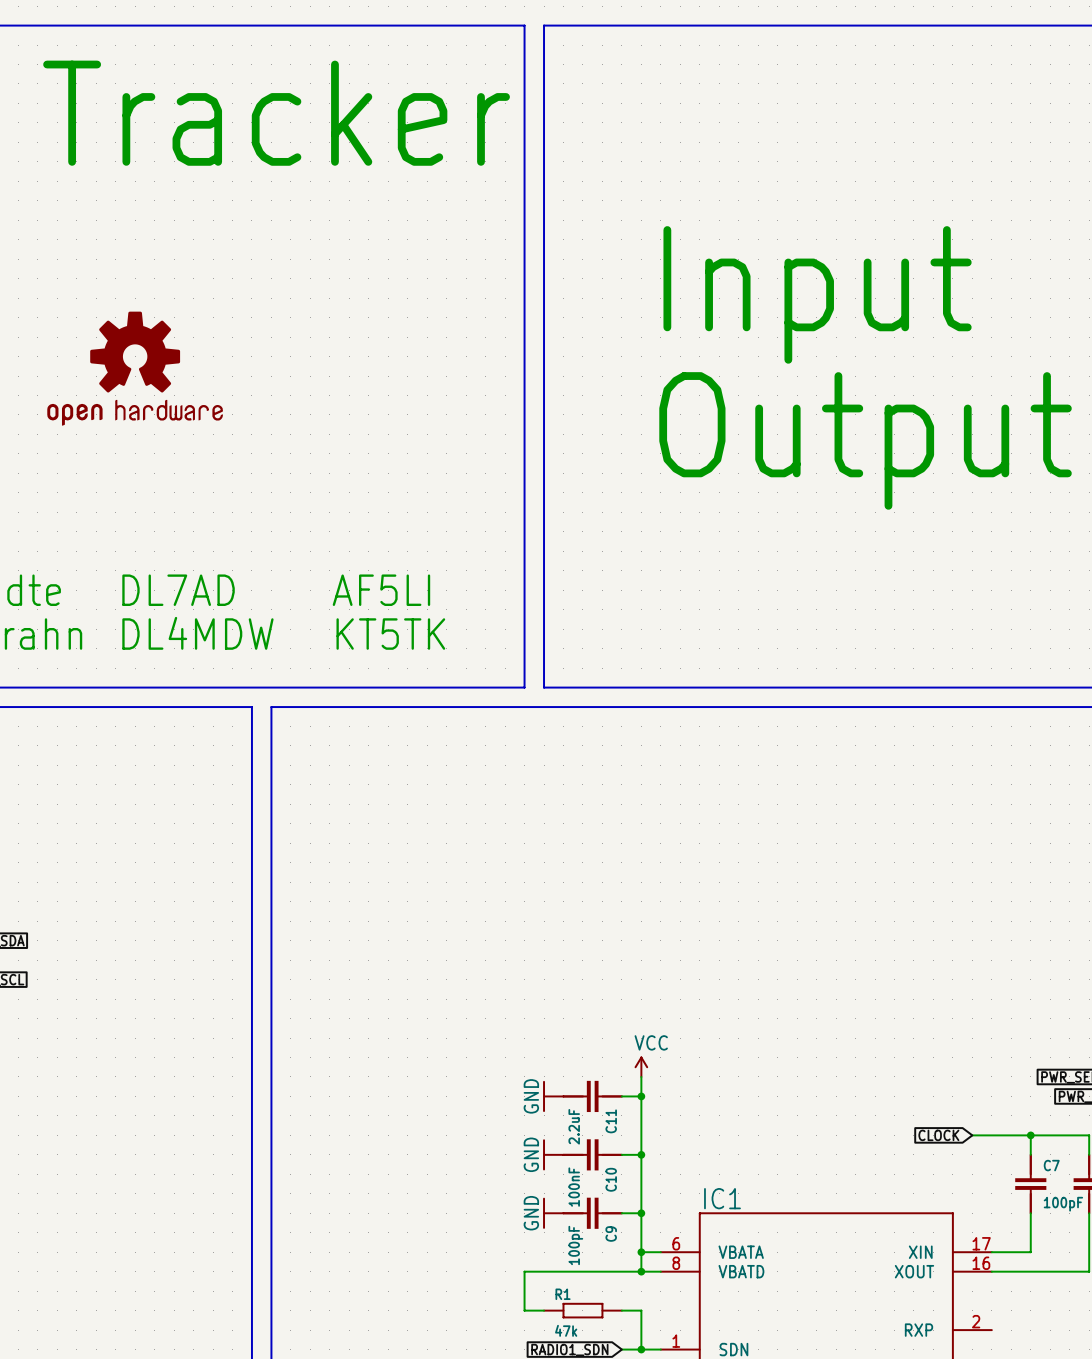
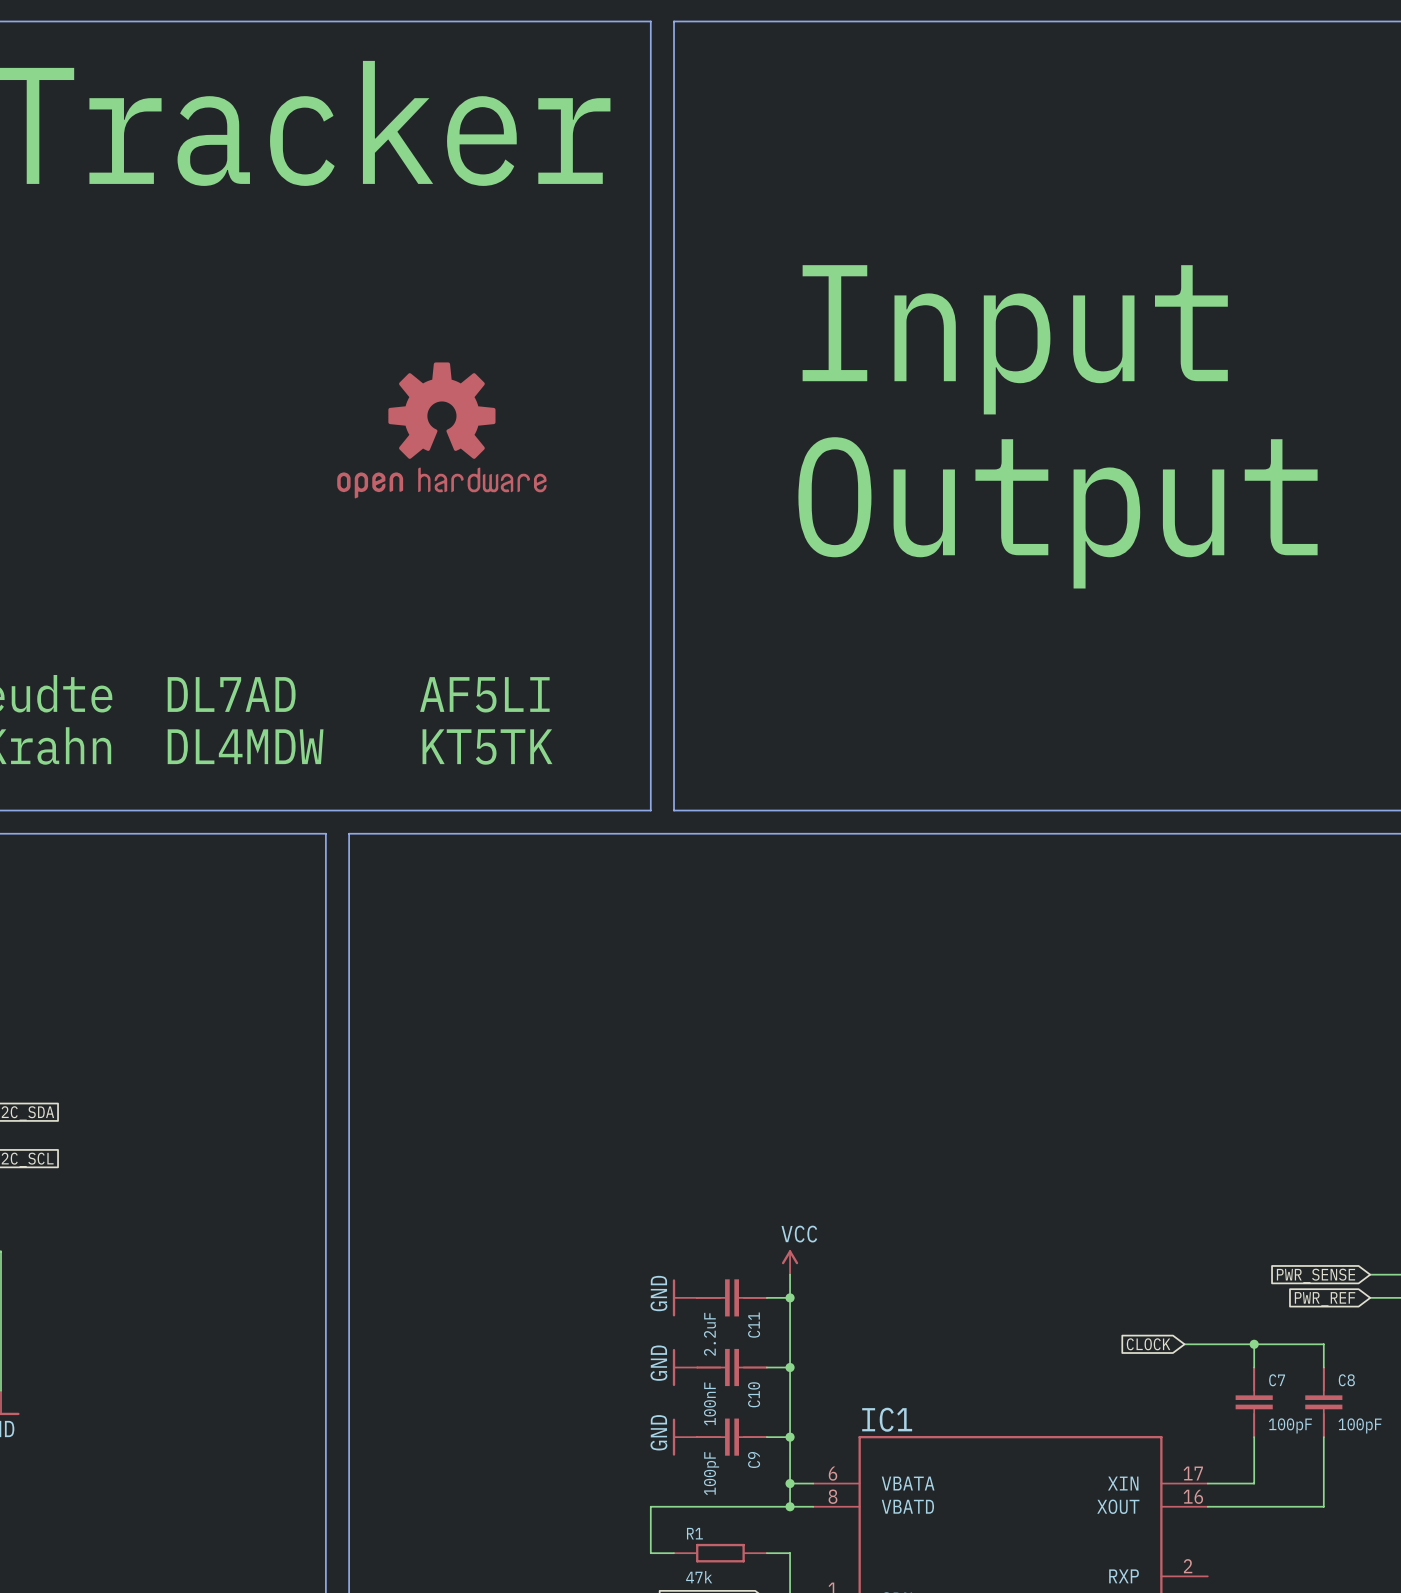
part: (135, 368) -> none
part: none -> (441, 430)

